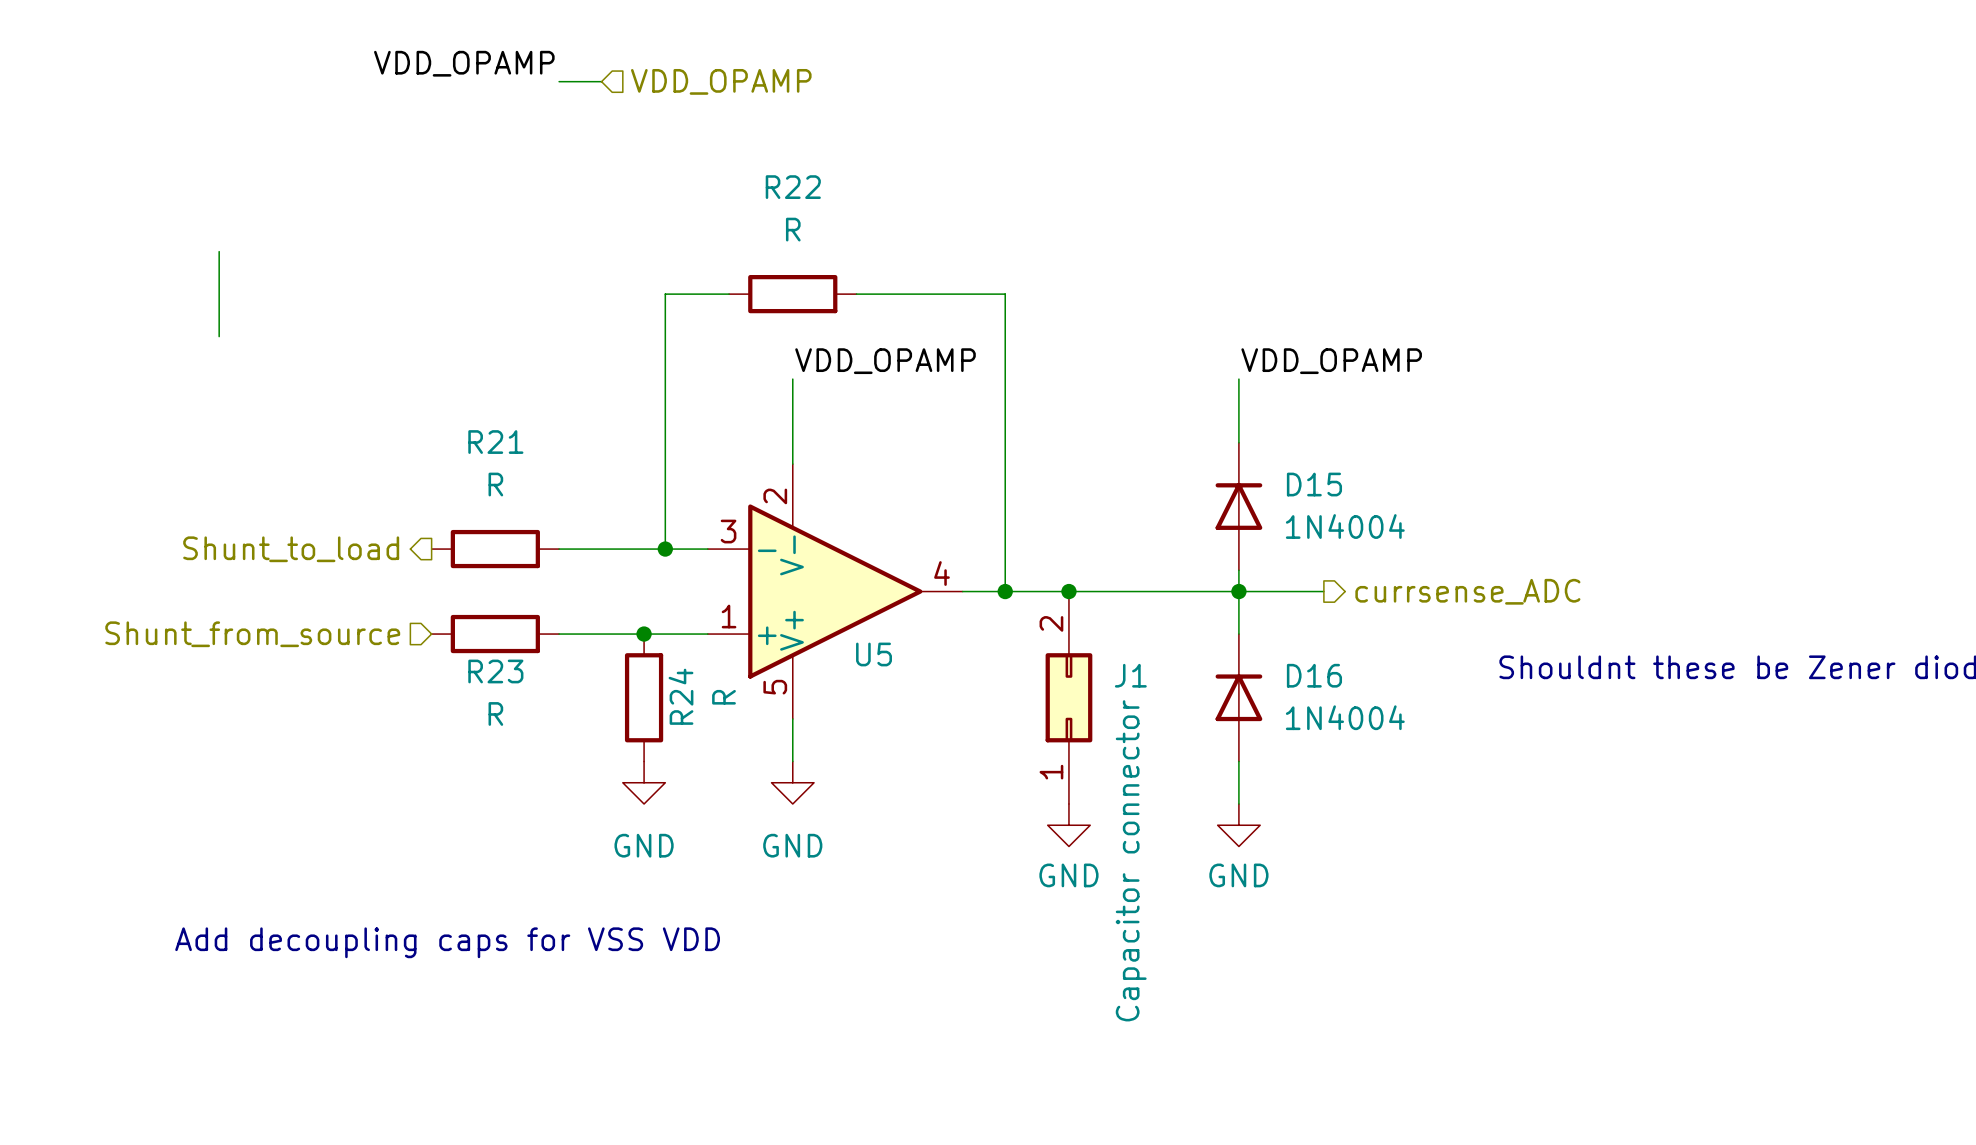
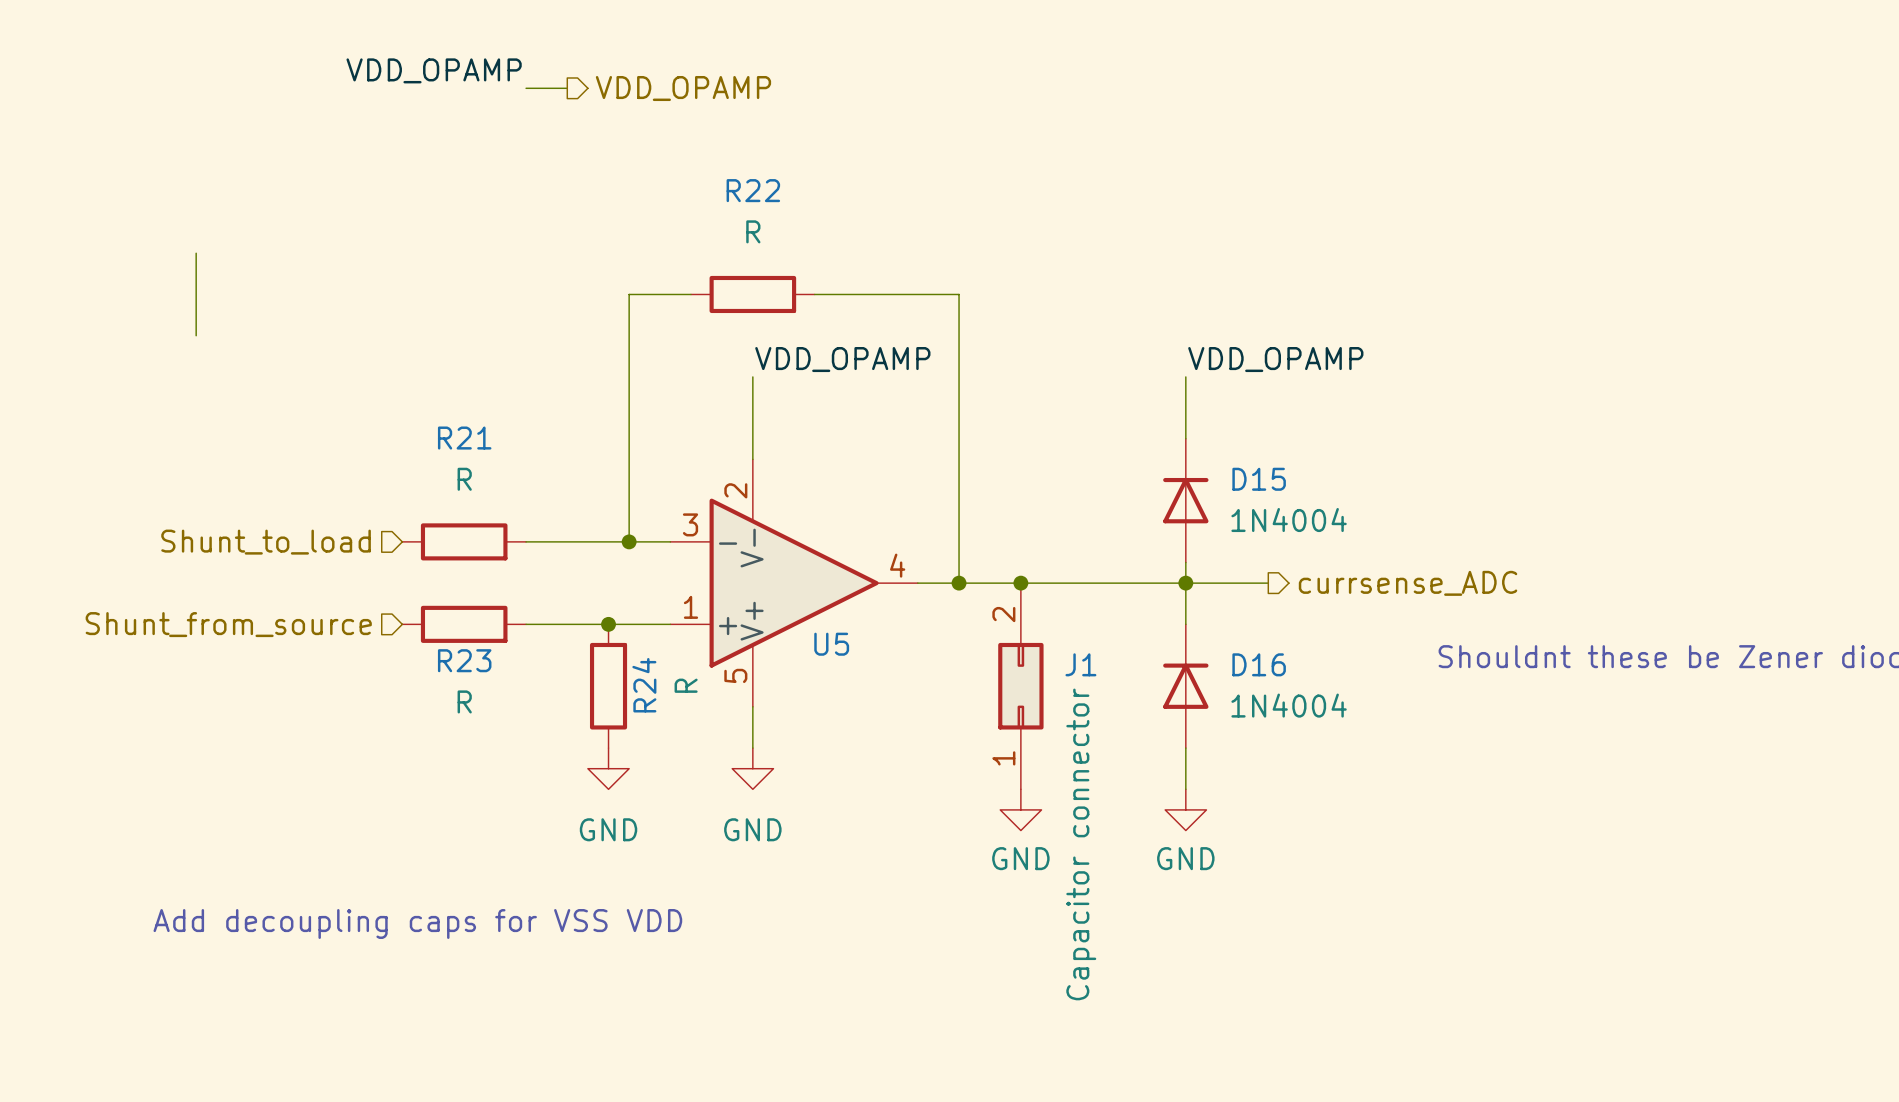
hierarchical label shape: input (721, 81) -> output (683, 88)
hierarchical label shape: output (291, 549) -> input (266, 542)

